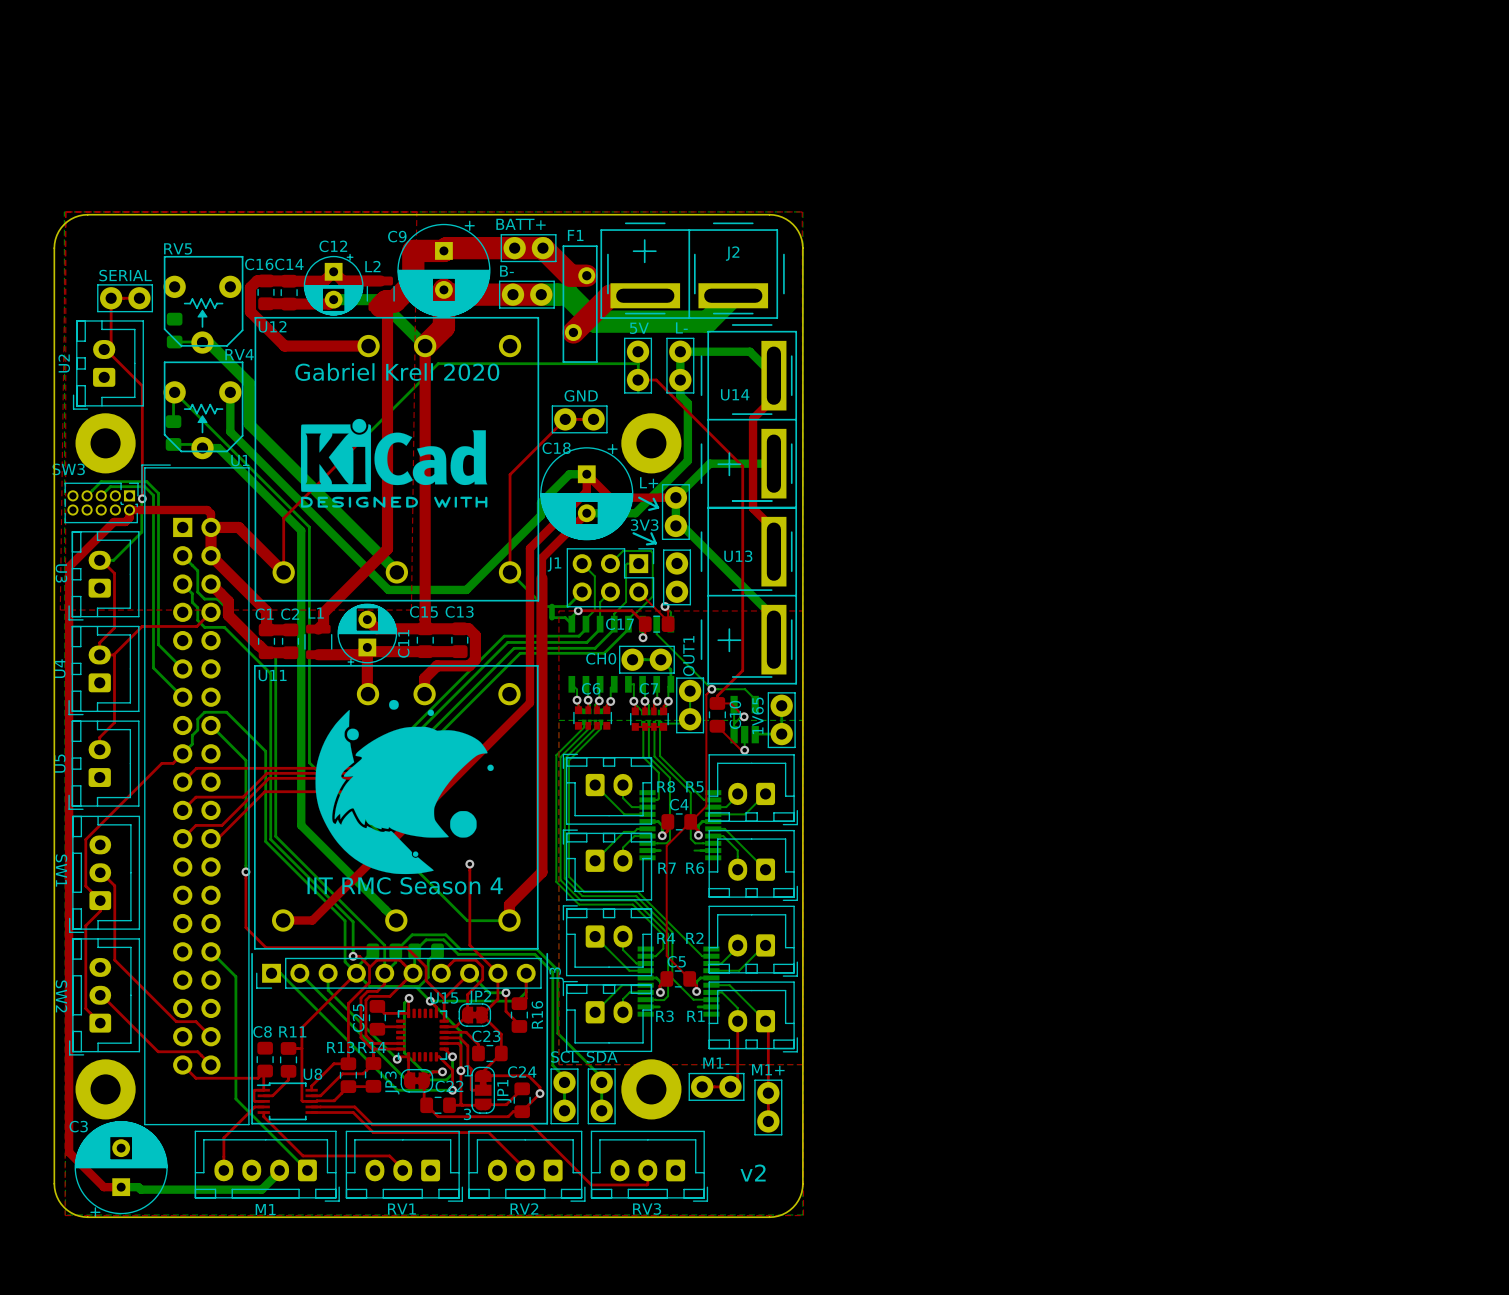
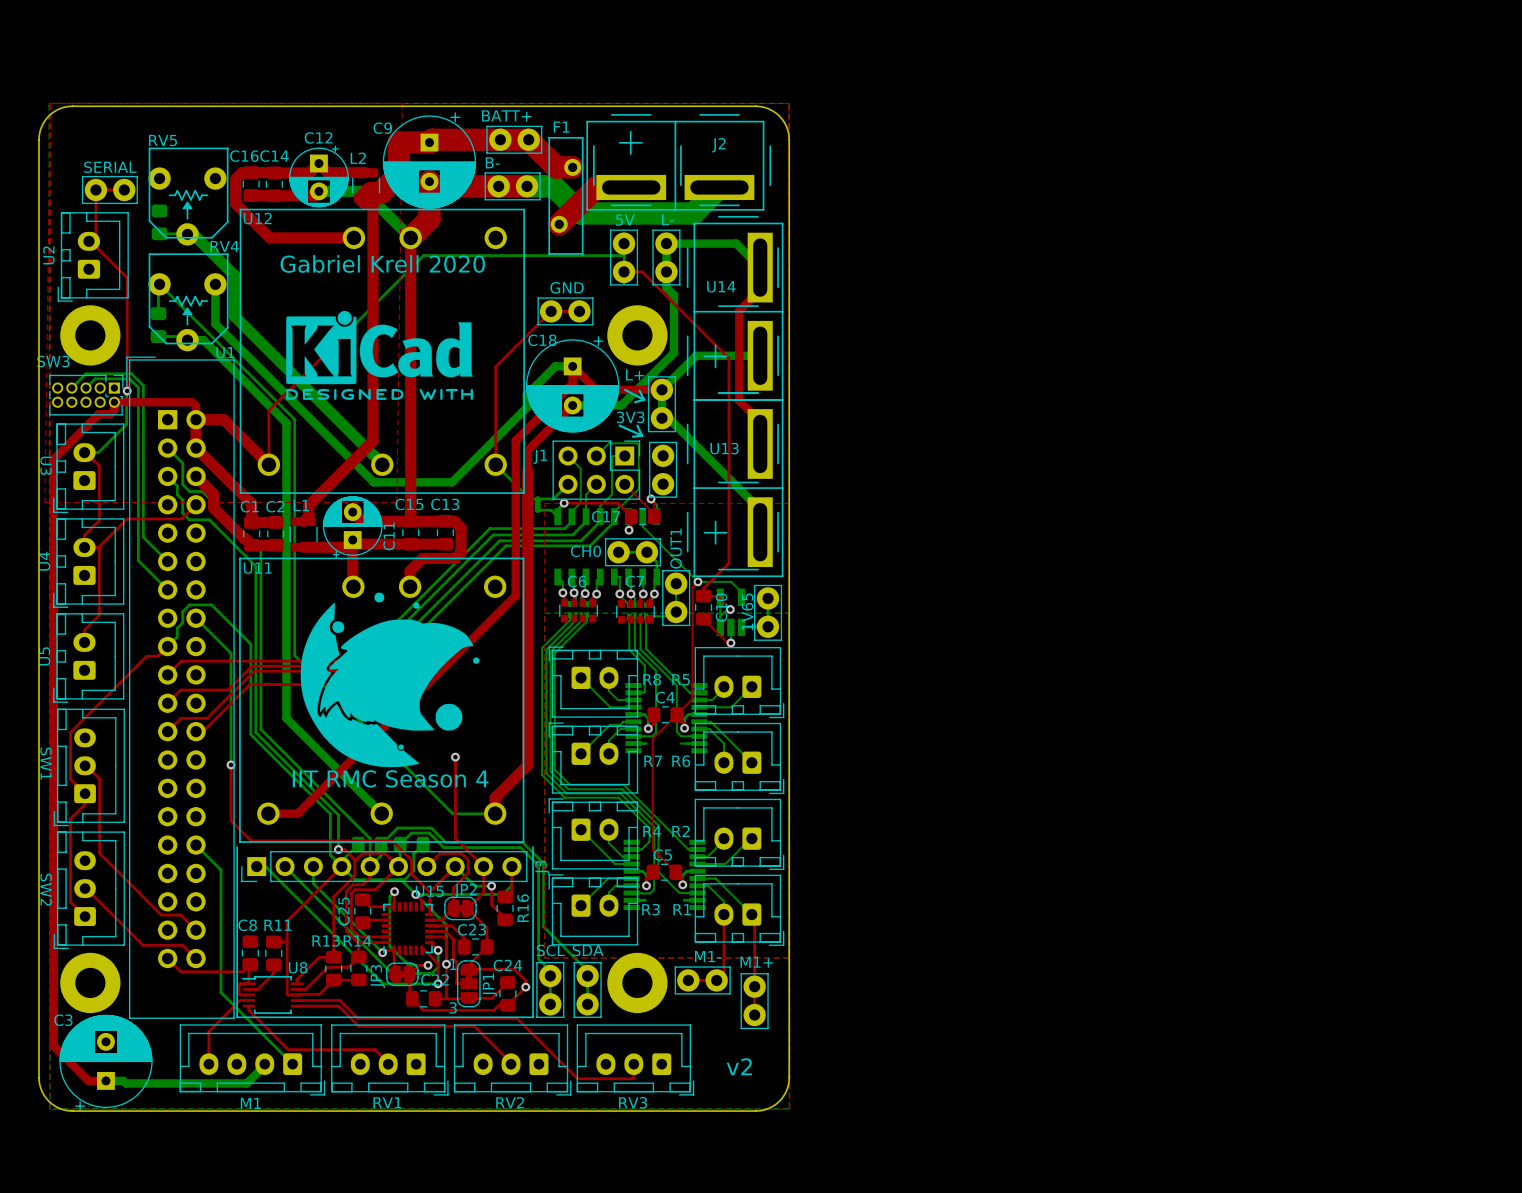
OUT1 name: OUT1 (688, 656) -> none
OUT1 text: none -> OUT1 (676, 548)
CH0 text: none -> CH0 (585, 551)
CH0 name: CH0 (601, 658) -> none
1V65 name: 1V65 (757, 715) -> none
1V65 text: none -> 1V65 (747, 611)
M1- name: M1- (716, 1063) -> none
M1- text: none -> M1- (708, 956)
M1+ text: none -> M1+ (756, 962)
M1+ name: M1+ (768, 1069) -> none

